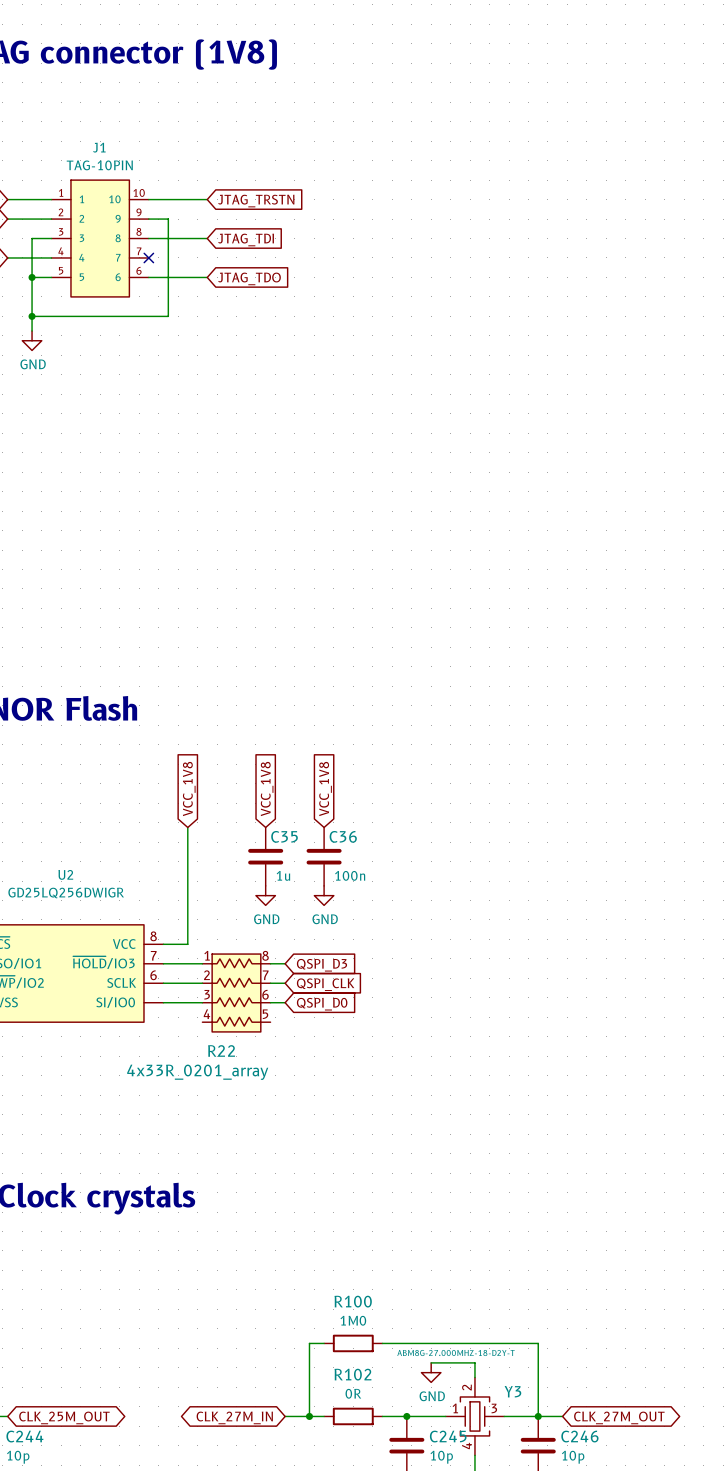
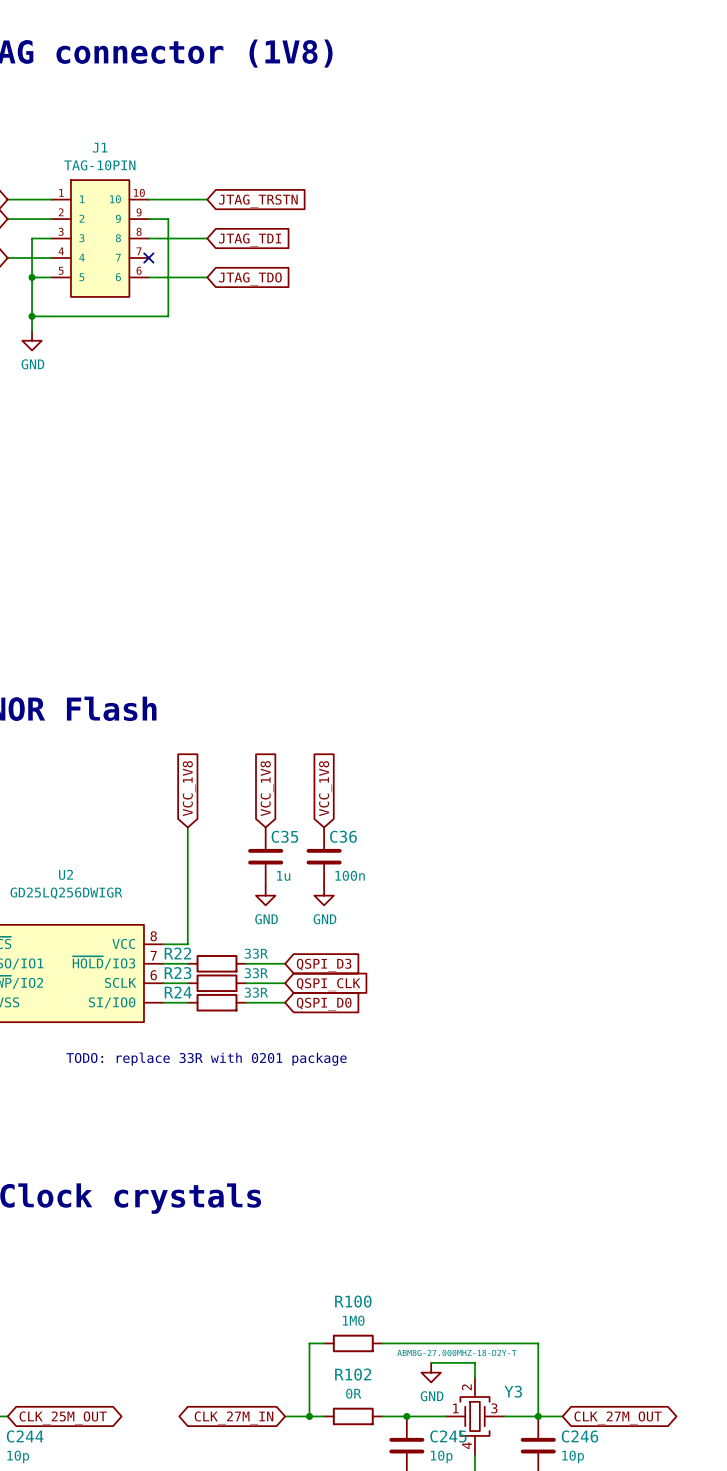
R22 text: none -> 33R (256, 953)
R22 symbol: [202, 954, 271, 1032] -> [187, 955, 247, 973]
R23: none -> (217, 983)
R24: none -> (217, 1002)
R22 name position: R22 (221, 1050) -> R22 (177, 953)
text: none -> TODO: replace 33R with 0201 package (206, 1059)
R22 value: 4x33R_0201_array (197, 1072) -> none

